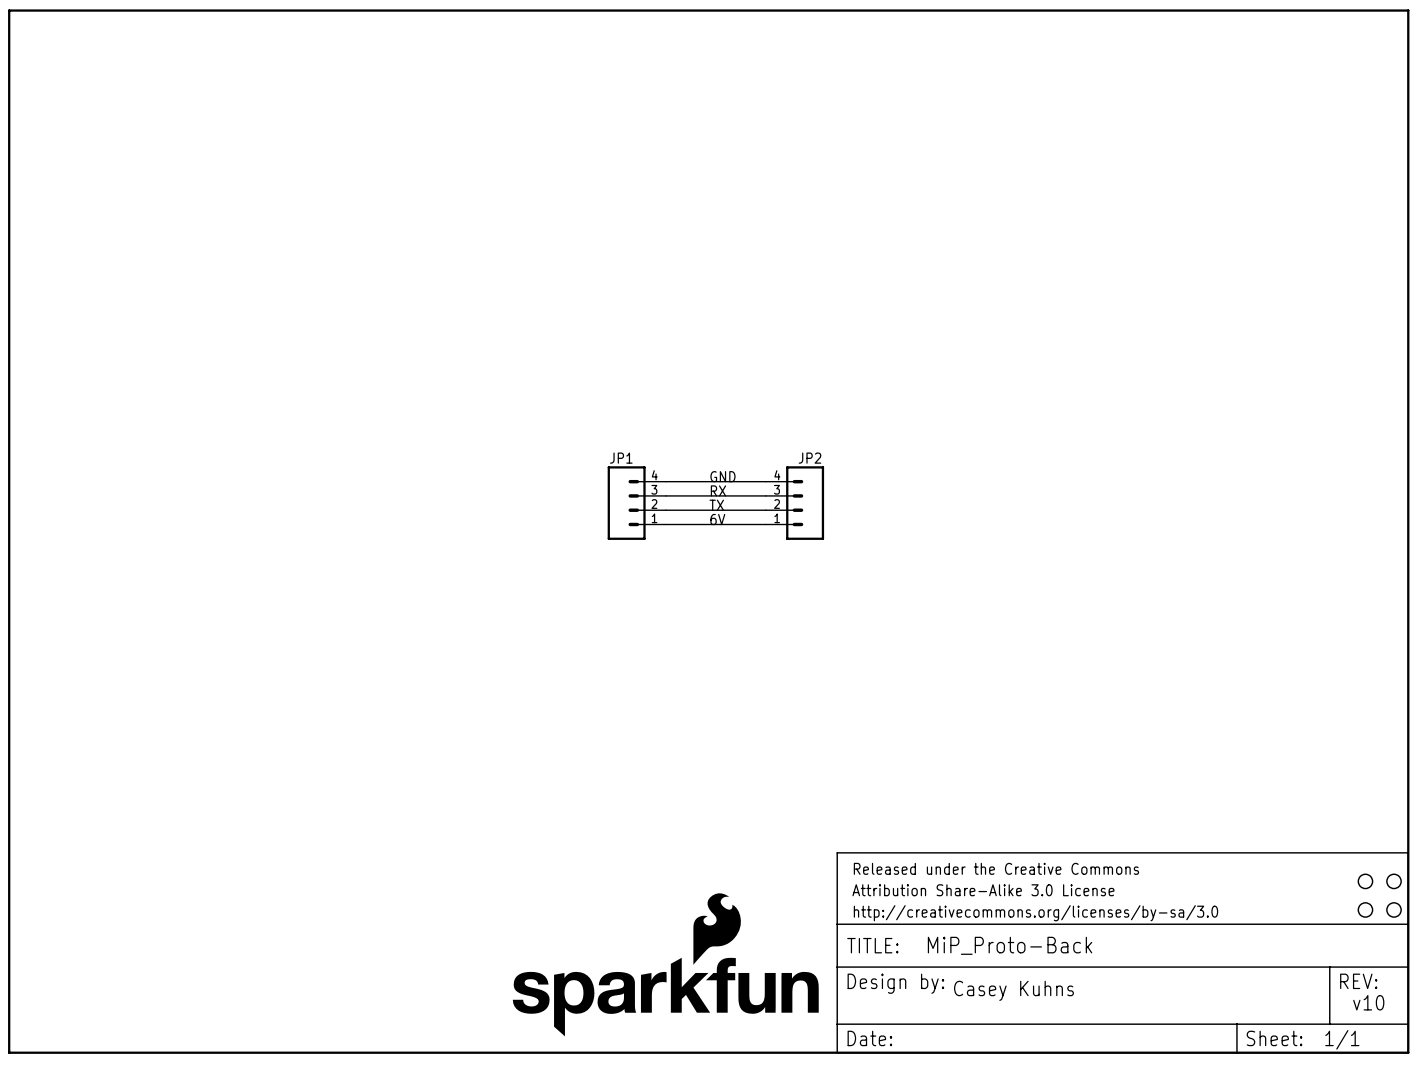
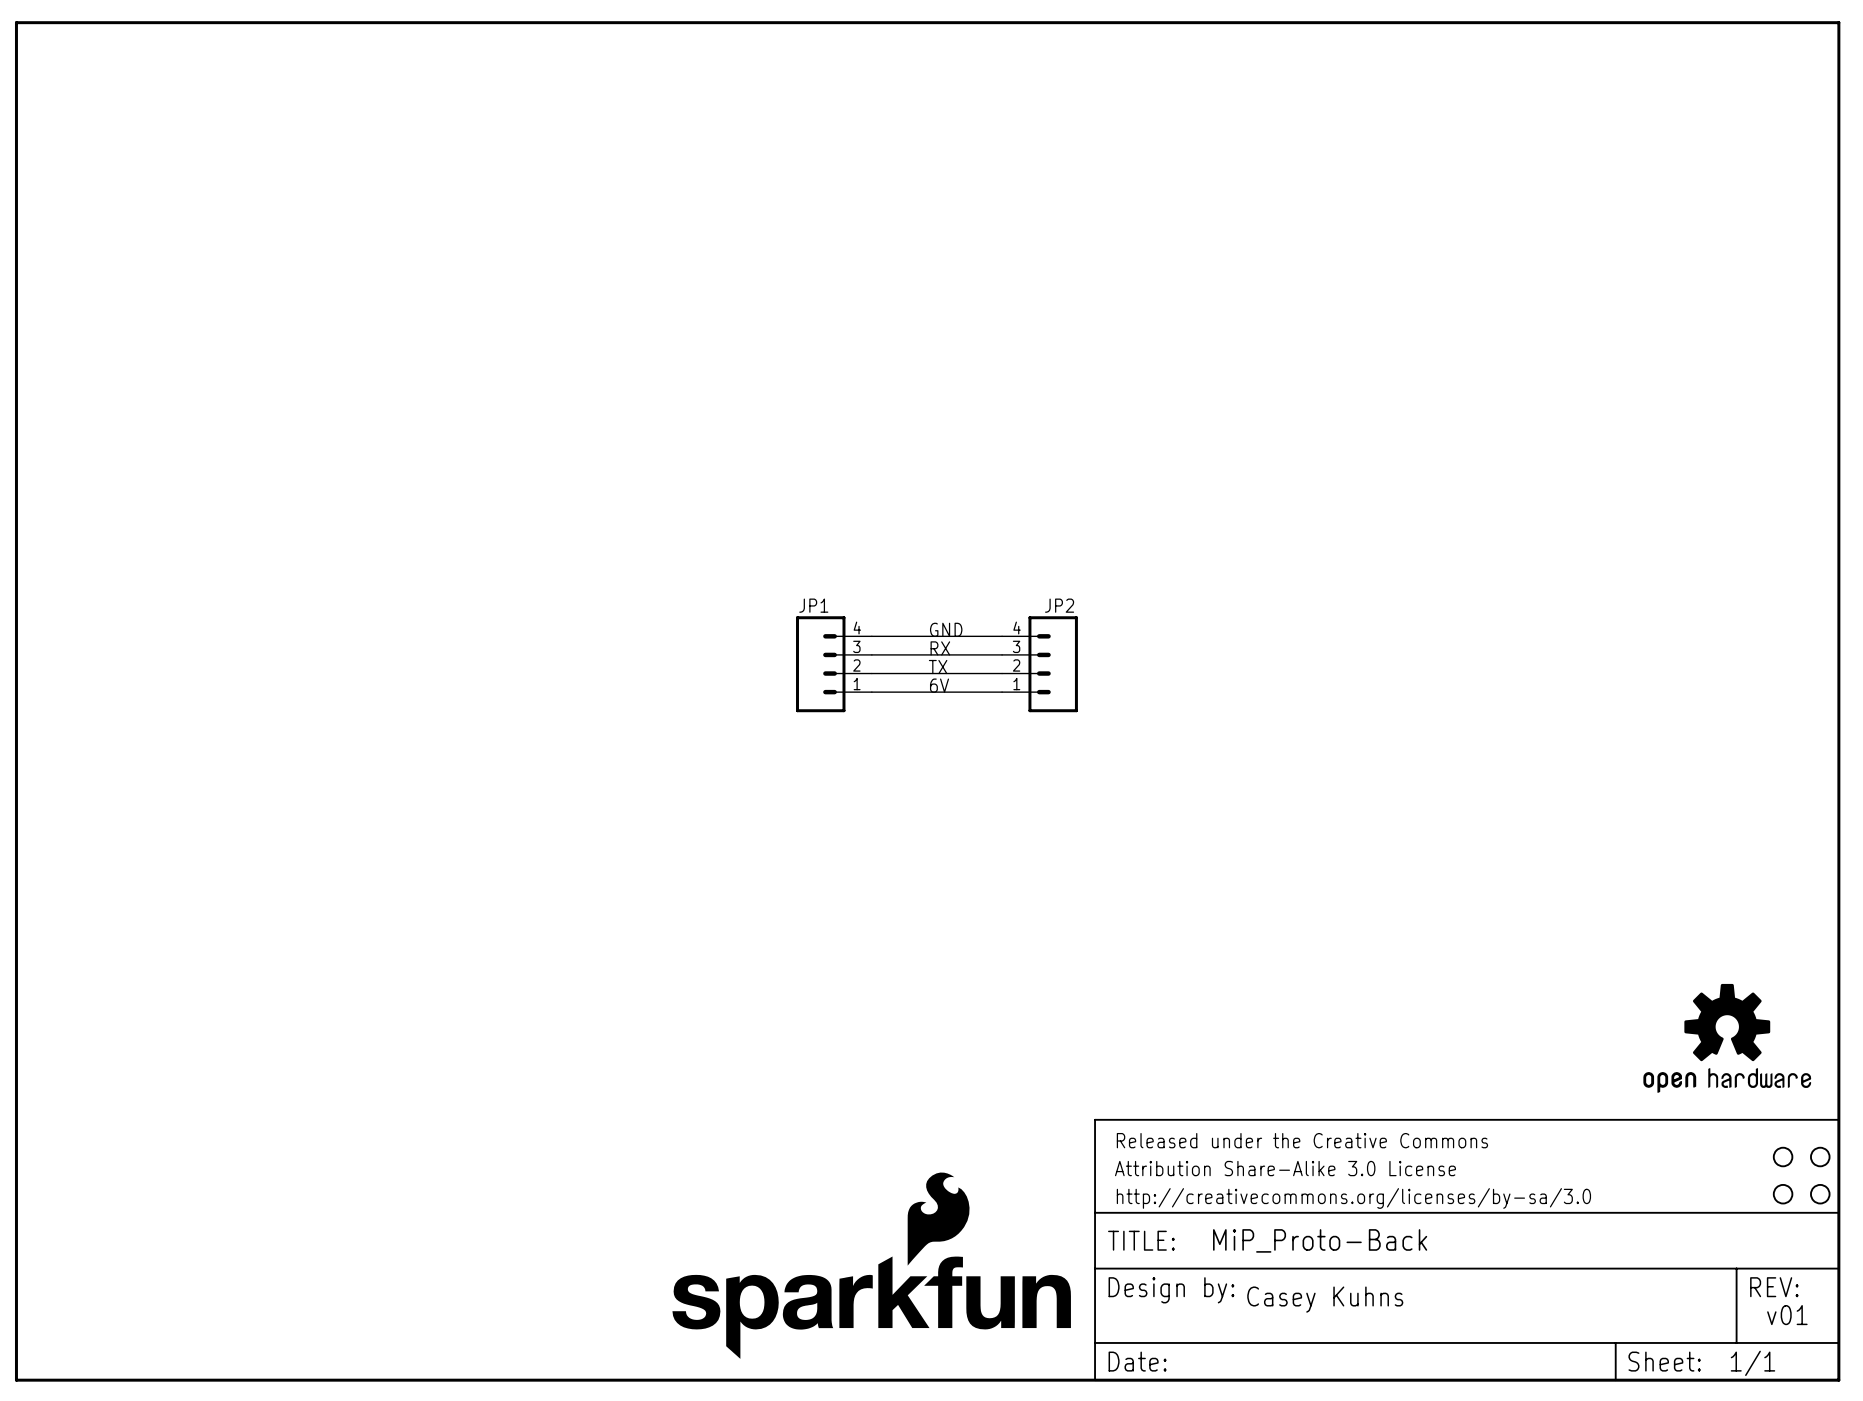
part: none -> (1727, 1038)
text: v10 (1368, 1002) -> v01 (1787, 1315)

